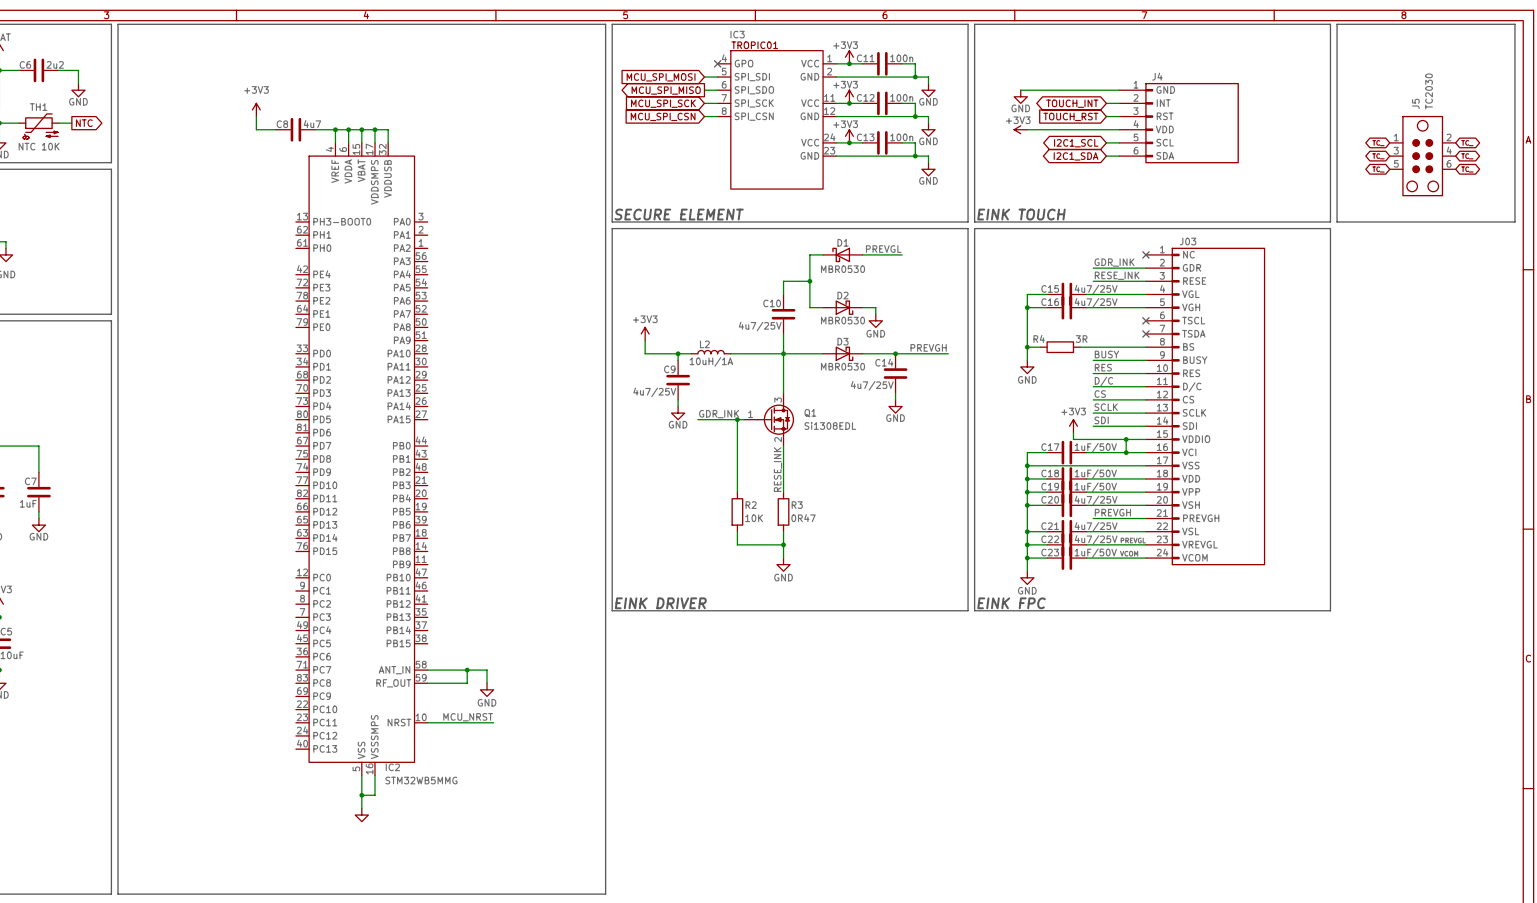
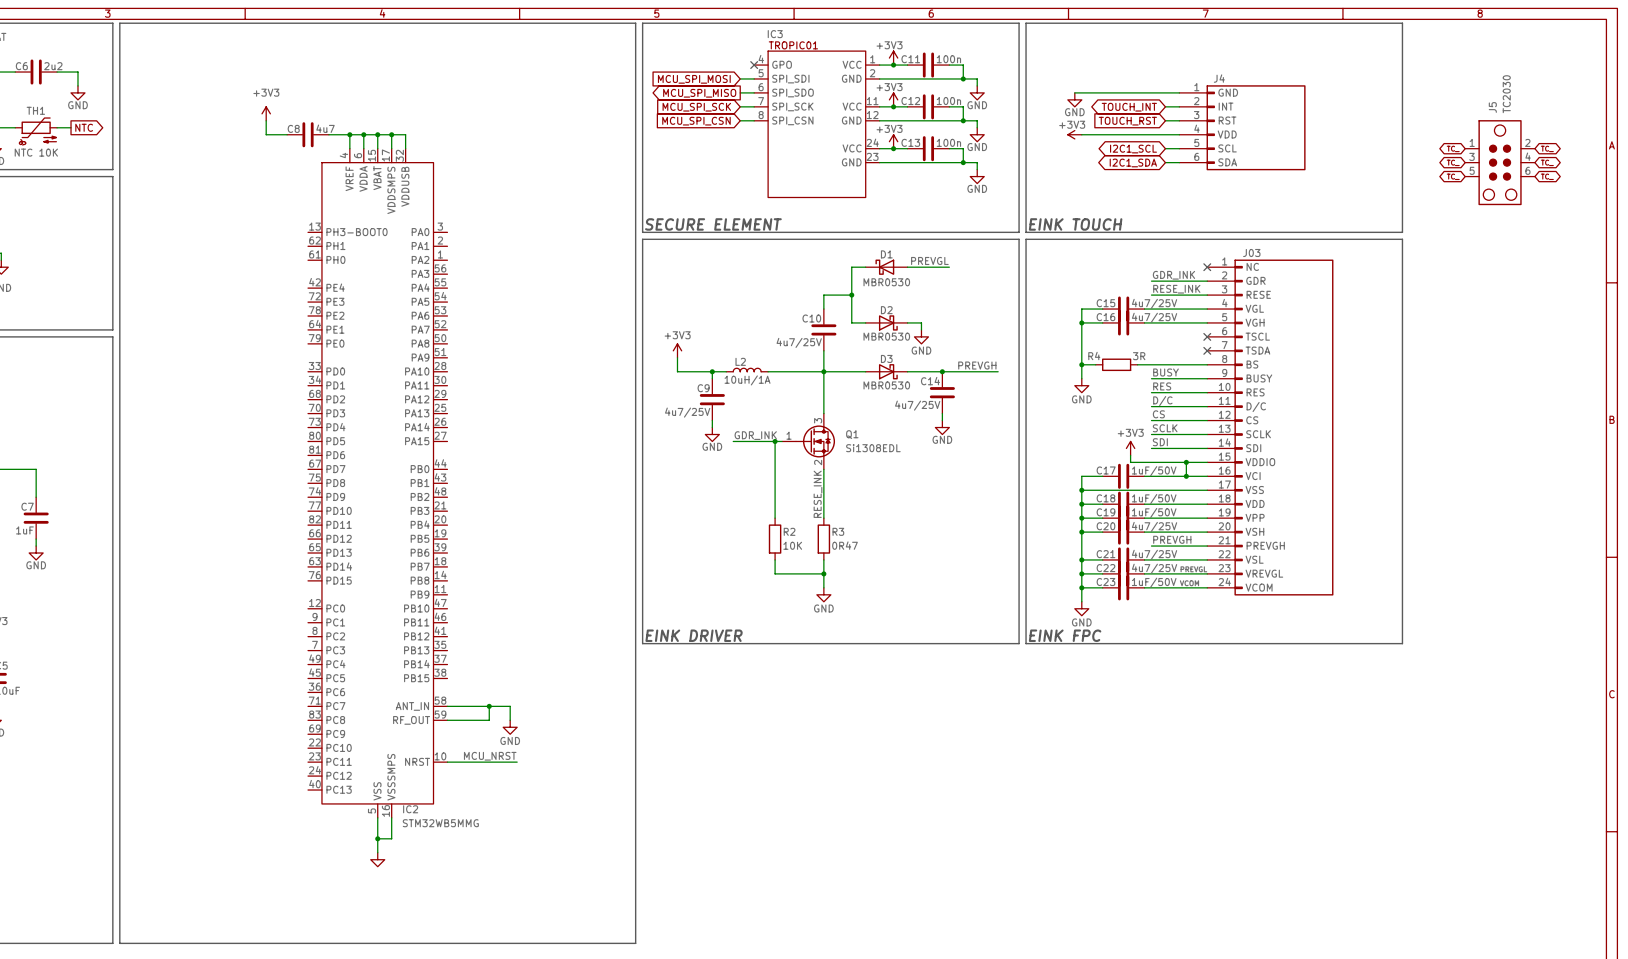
line: (1337, 24) (1514, 24) (1514, 221) (1337, 221) (1337, 24) -> none

